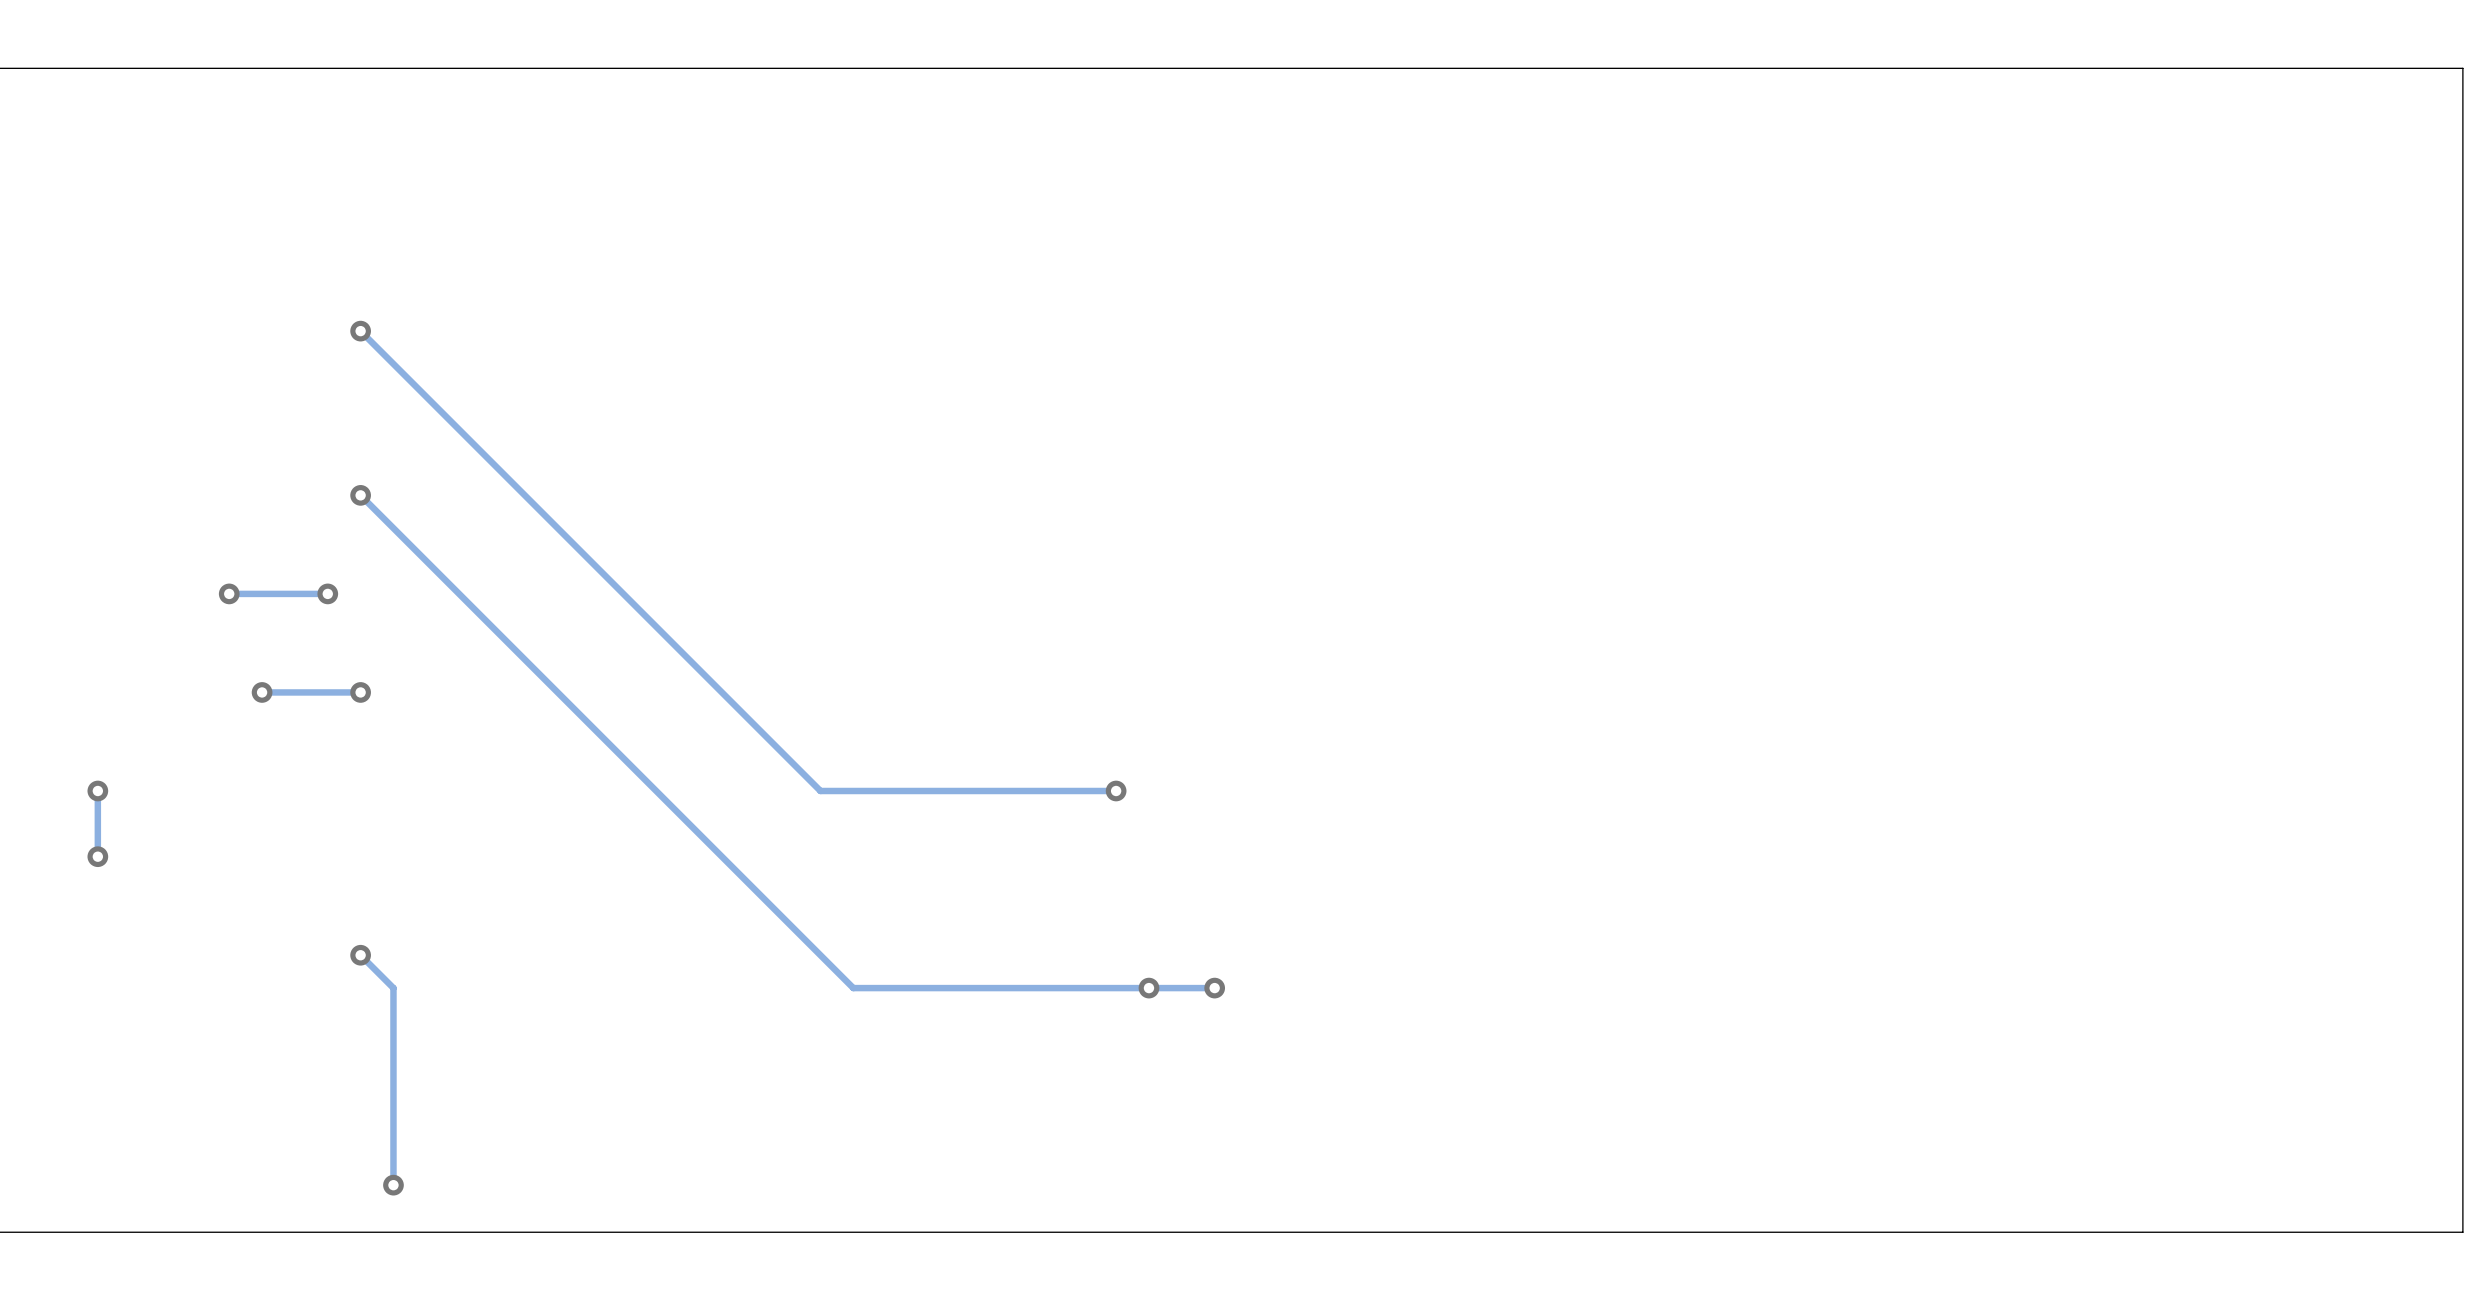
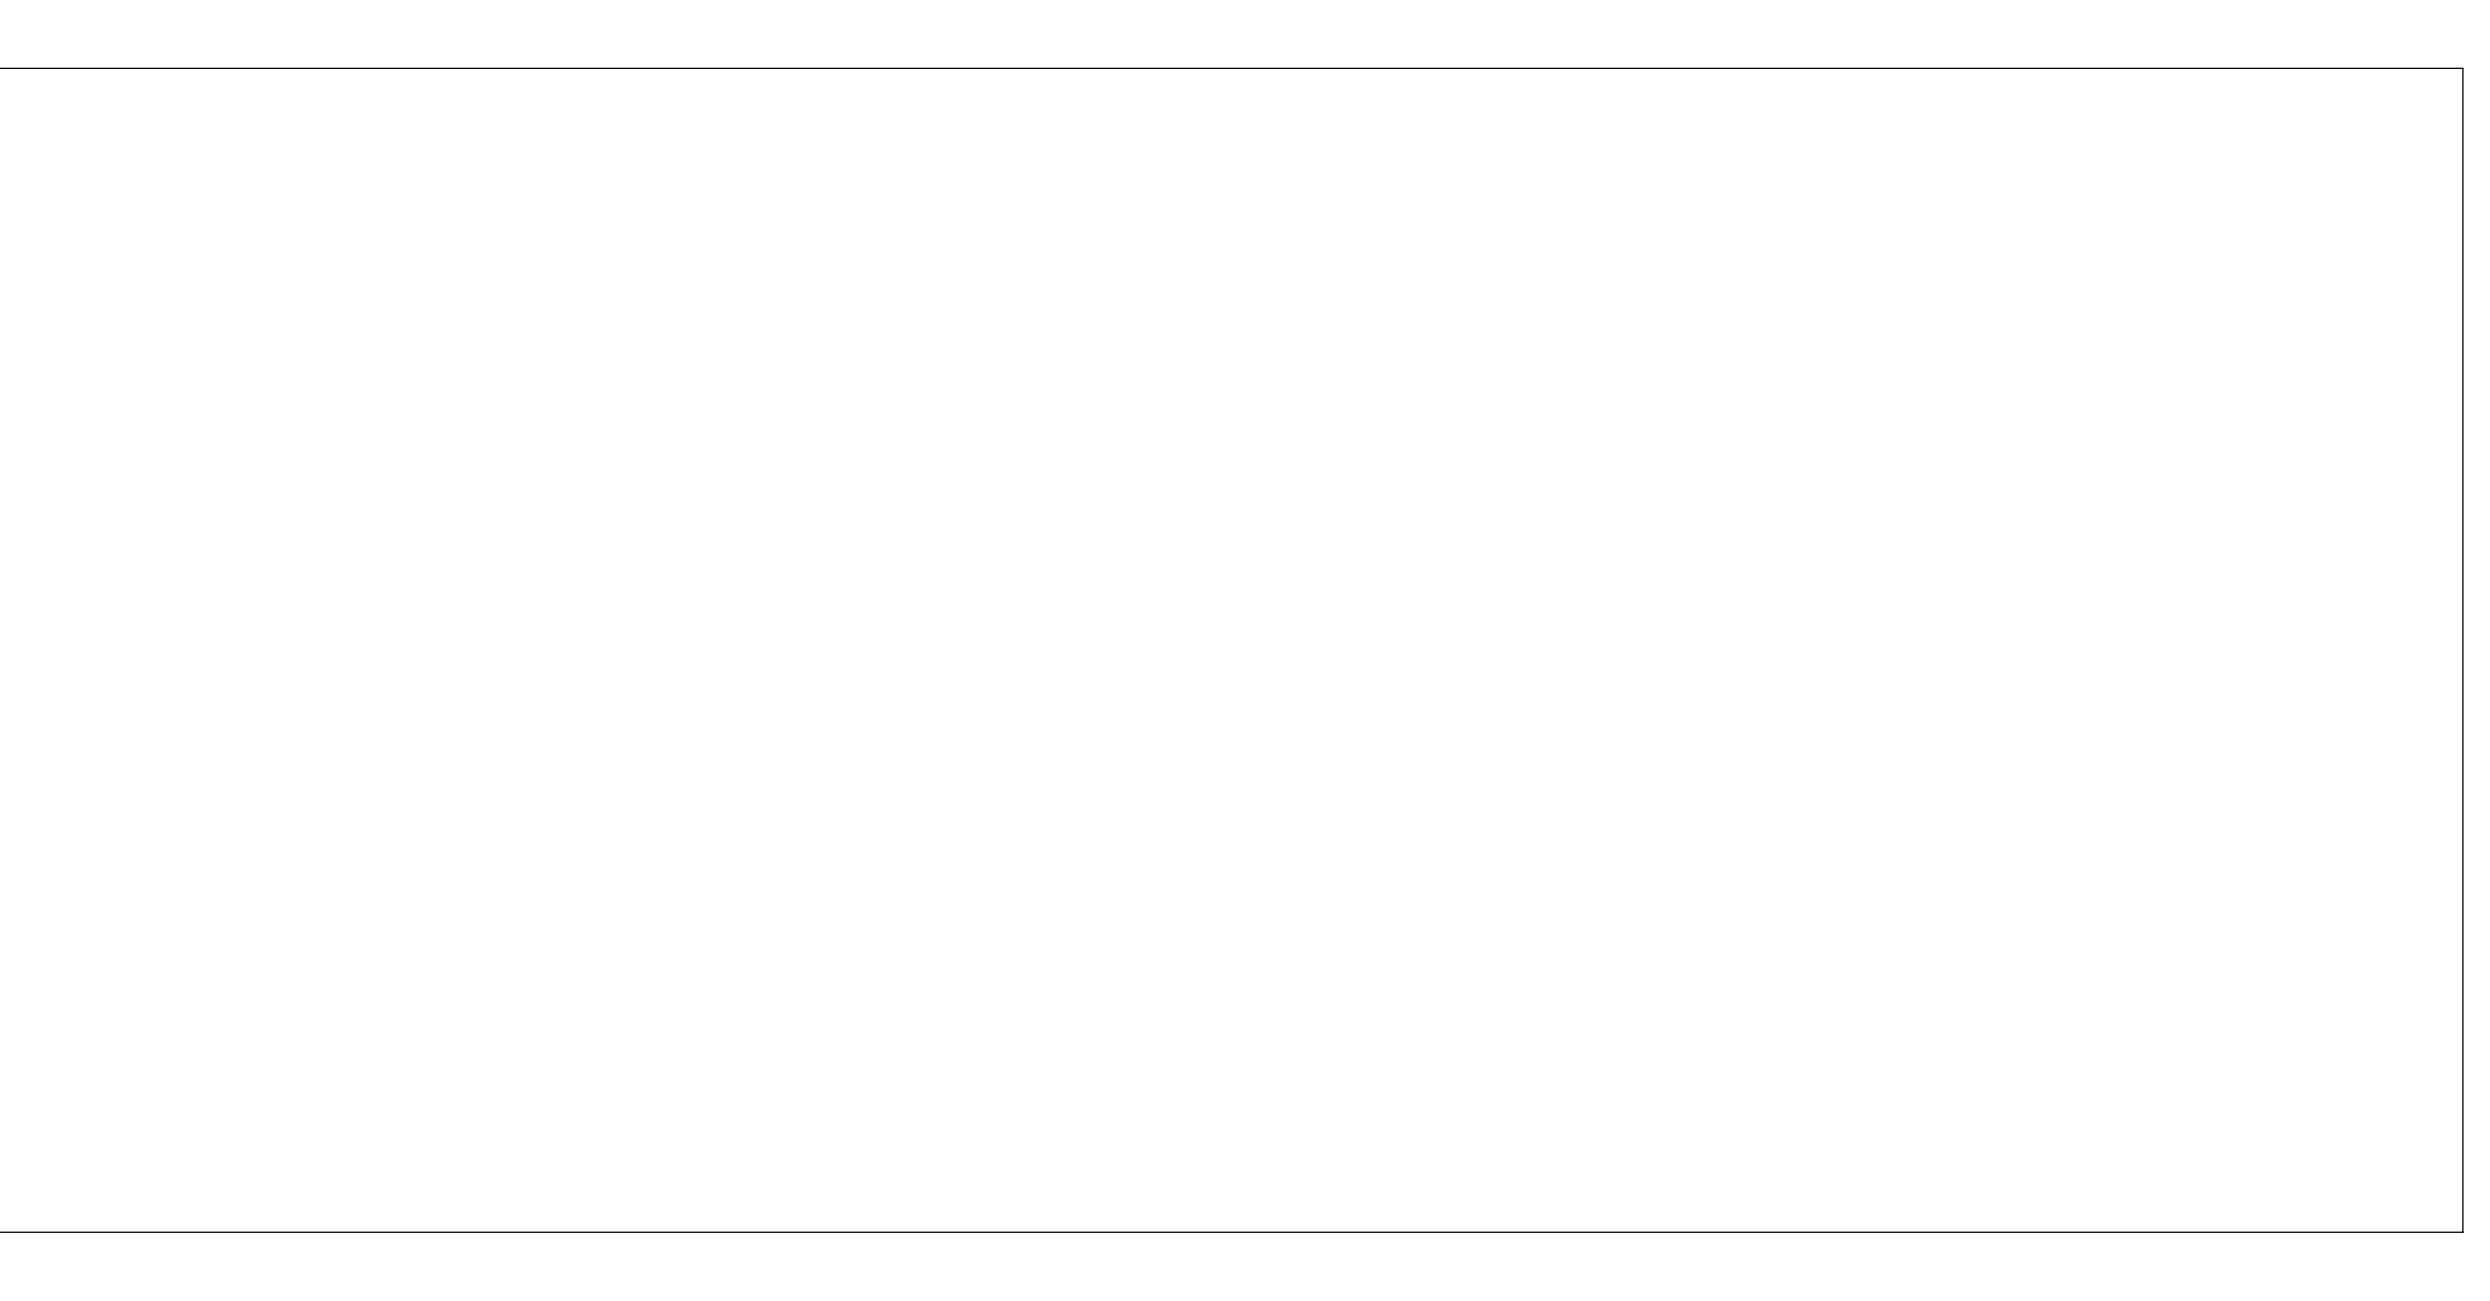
track: (360, 331) (820, 790) (1116, 790) -> none
via: (360, 331) -> none
track: (360, 495) (853, 988) (1214, 988) -> none
via: (360, 495) -> none
via: (229, 593) -> none
track: (327, 593) (229, 593) -> none
via: (327, 593) -> none
via: (262, 692) -> none
track: (360, 692) (262, 692) -> none
via: (360, 692) -> none
track: (97, 790) (97, 856) -> none
via: (97, 790) -> none
via: (1116, 790) -> none
via: (97, 856) -> none
track: (360, 955) (393, 988) (393, 1185) -> none
via: (360, 955) -> none
via: (1148, 988) -> none
via: (1214, 988) -> none
via: (393, 1185) -> none

